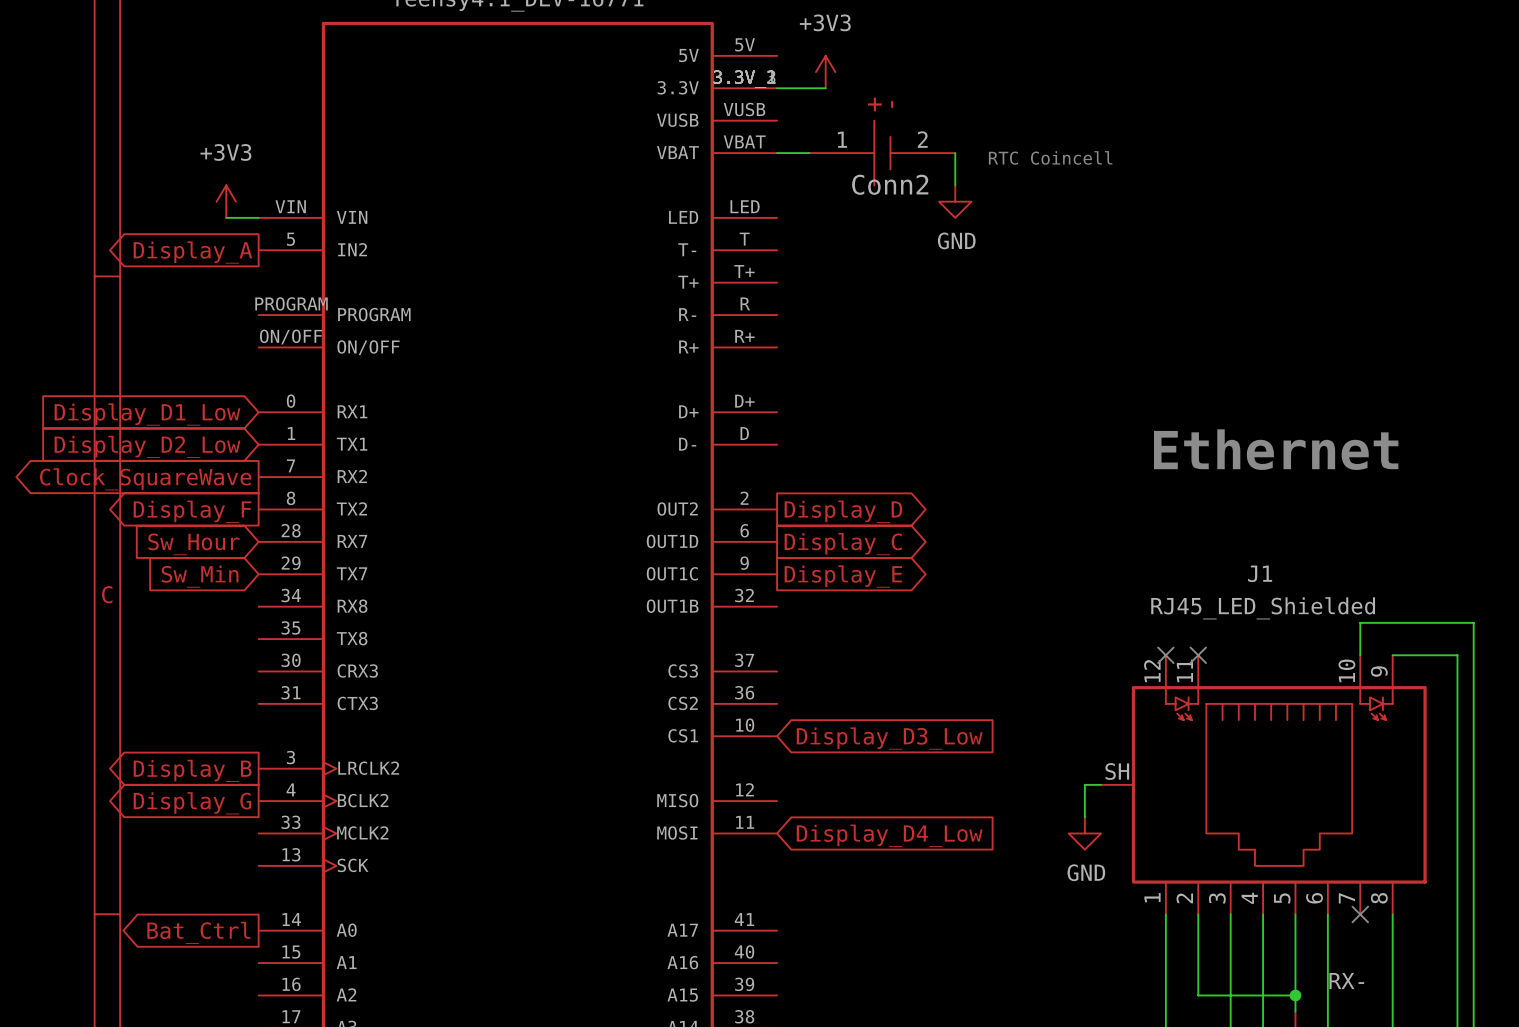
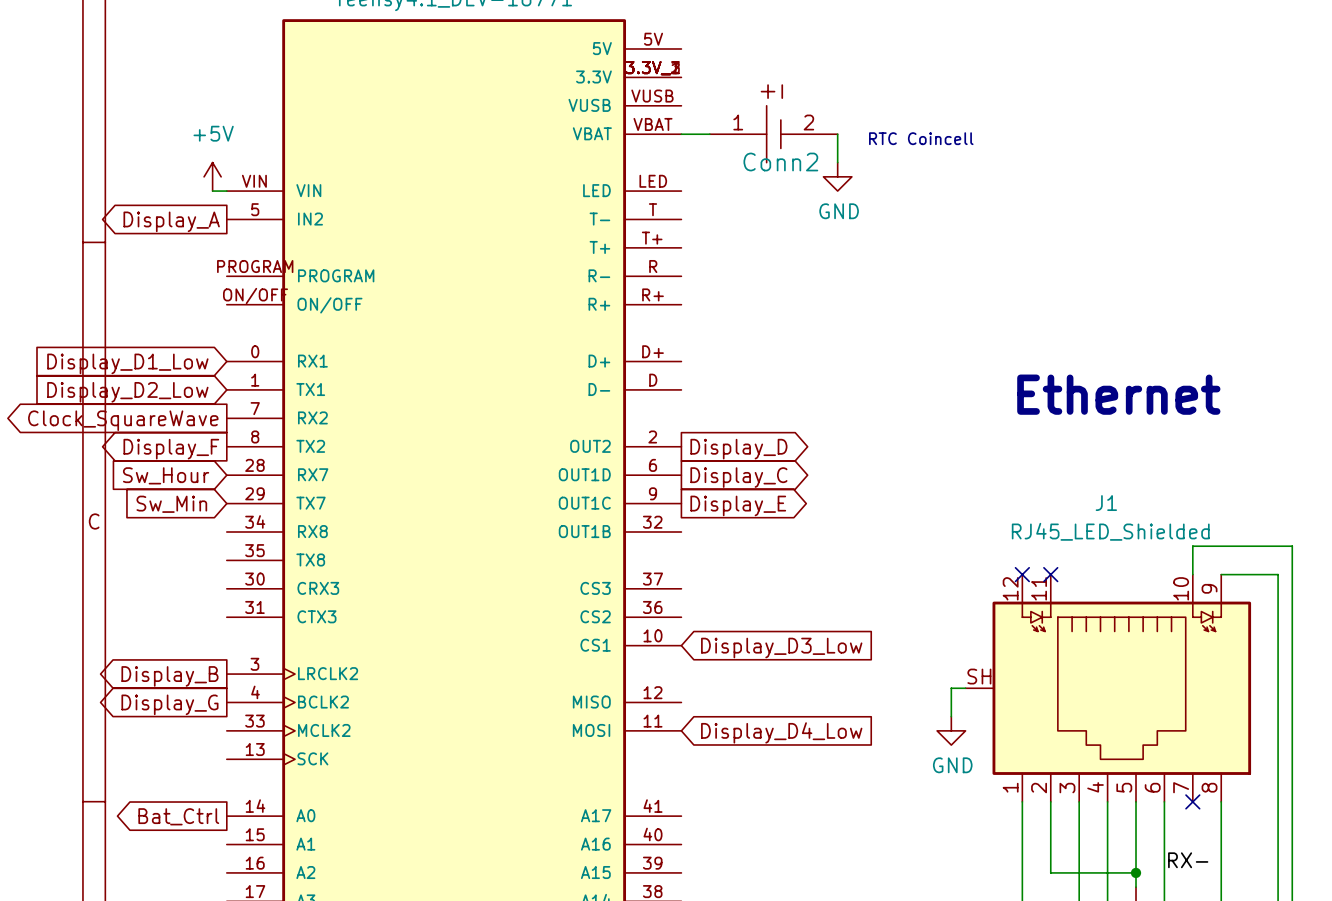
power symbol: +3V3 (825, 72) -> none
wire: (777, 88) (825, 88) -> none
power symbol: +3V3 (226, 201) -> none
power symbol: none -> +5V (212, 176)
wire: (226, 217) (242, 217) -> none

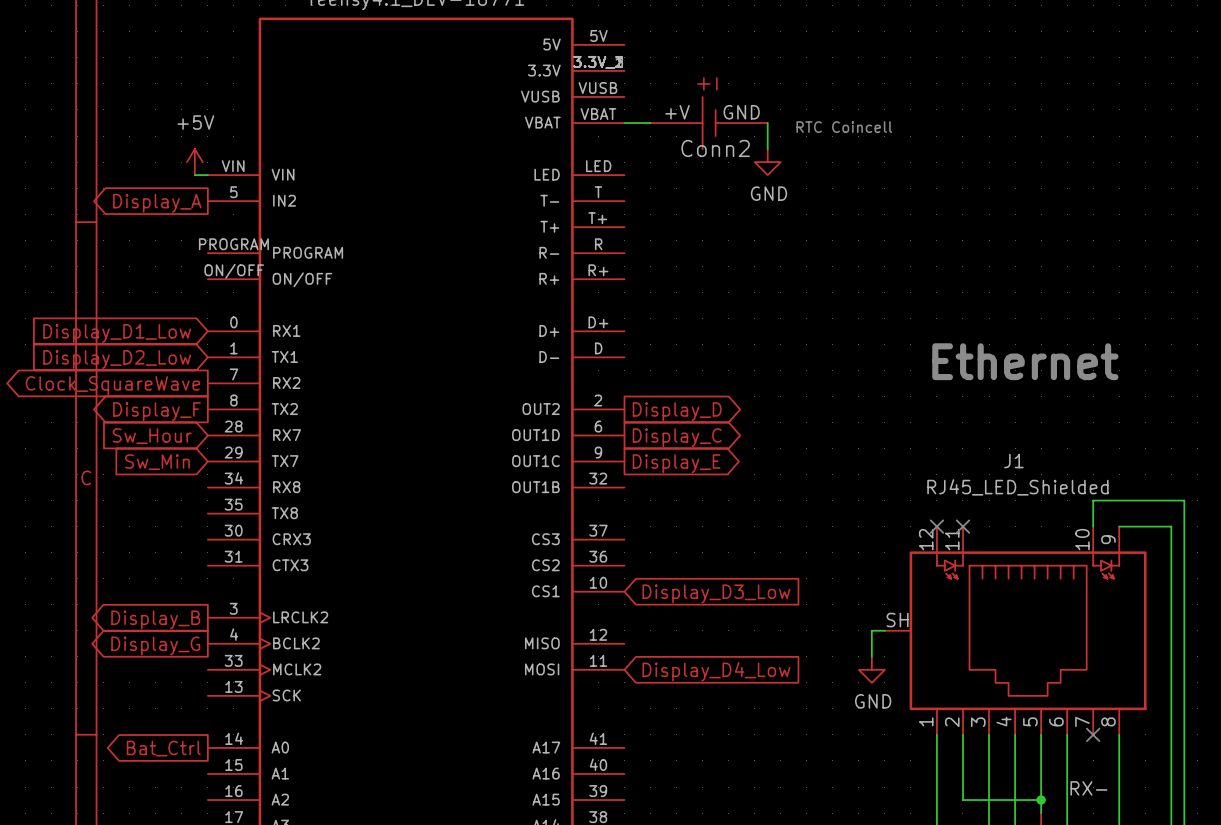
Conn2 pin number: 1 (738, 122) -> +V (677, 112)
Conn2 pin number: 2 (808, 122) -> GND (741, 112)

